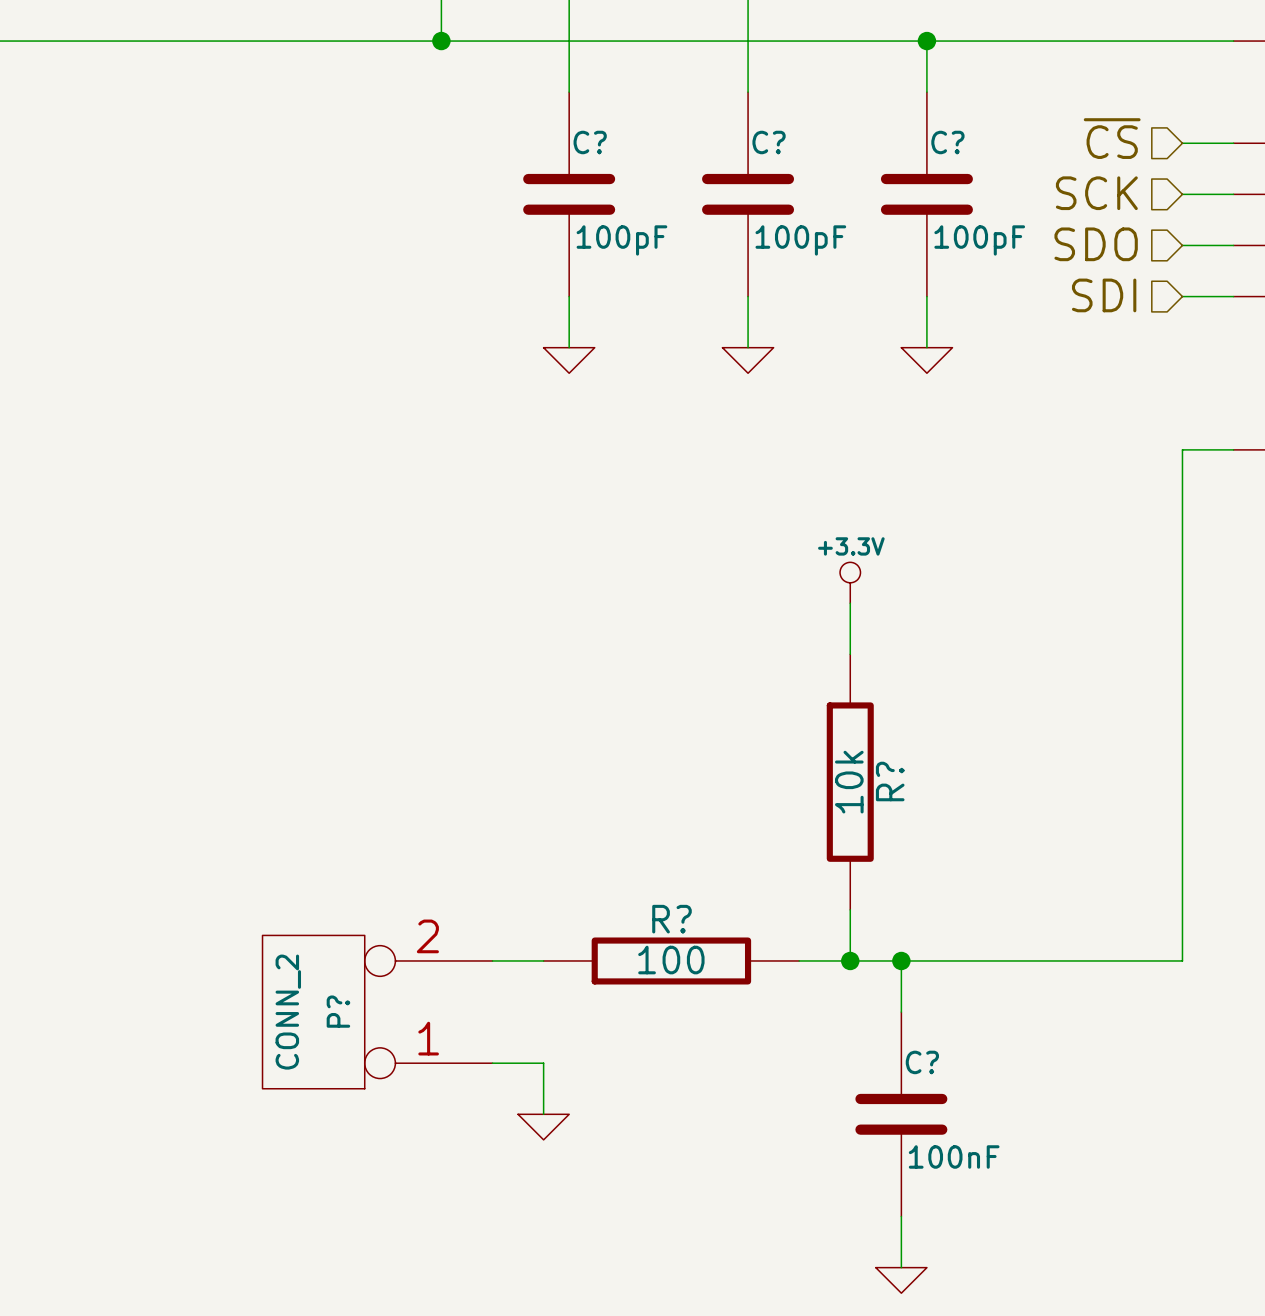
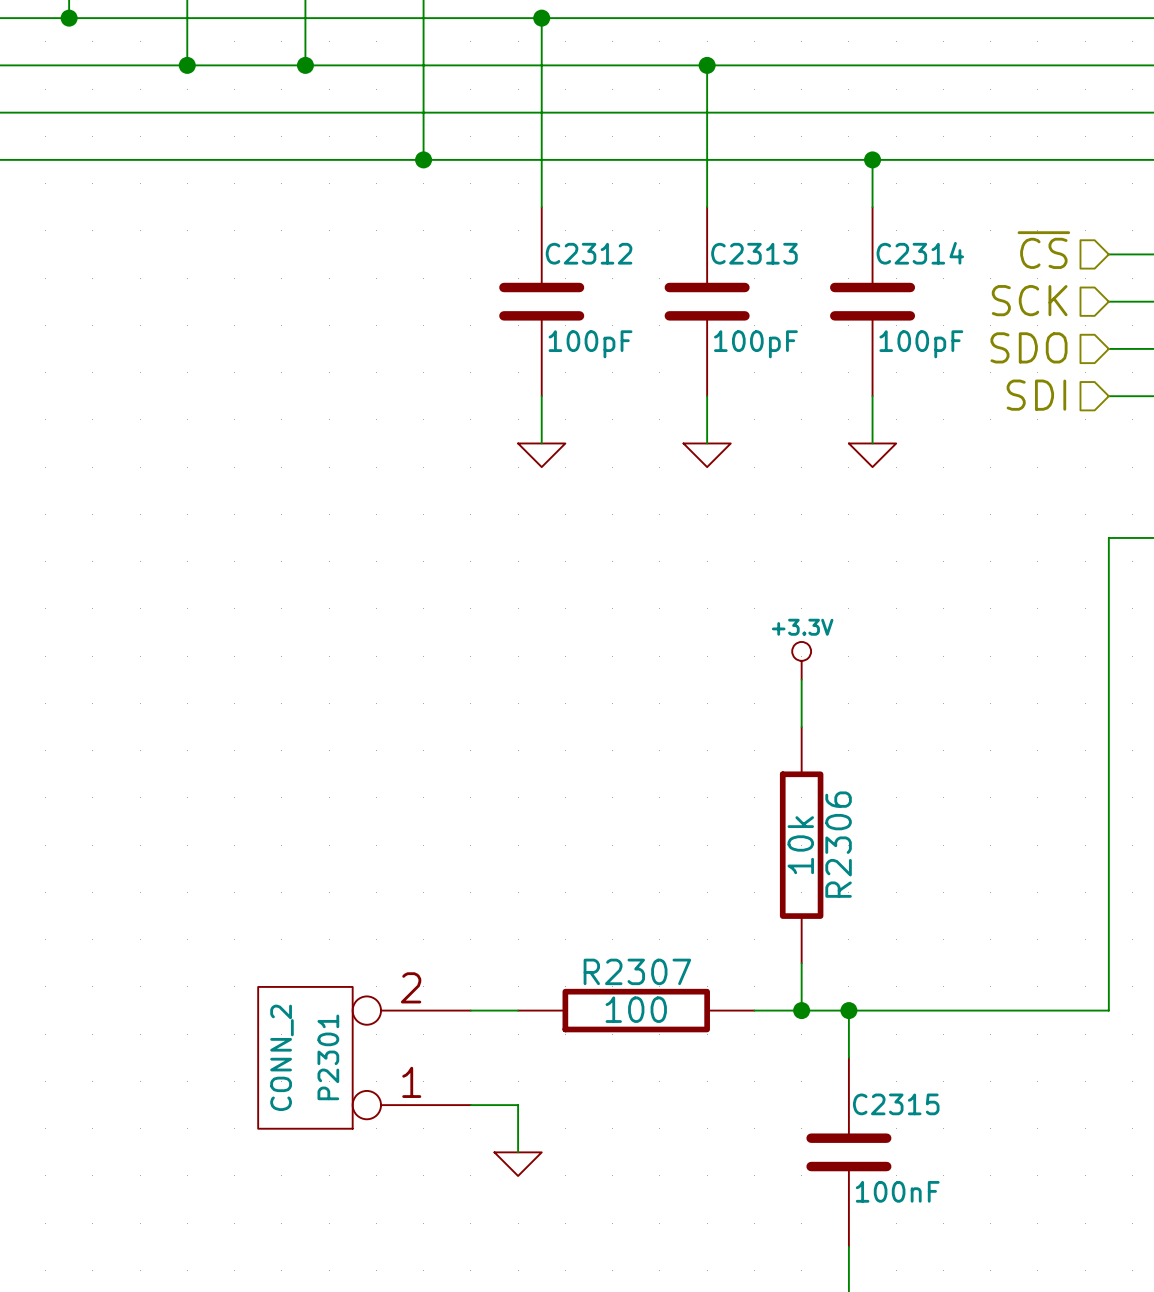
C? name: C? (590, 142) -> C2312 (589, 253)
C? name: C? (769, 142) -> C2313 (754, 253)
C? name: C? (947, 142) -> C2314 (920, 253)
R? name: R? (890, 781) -> R2306 (838, 844)
R? name: R? (671, 919) -> R2307 (637, 971)
P? name: P? (338, 1011) -> P2301 (328, 1057)
C? name: C? (922, 1062) -> C2315 (896, 1104)

